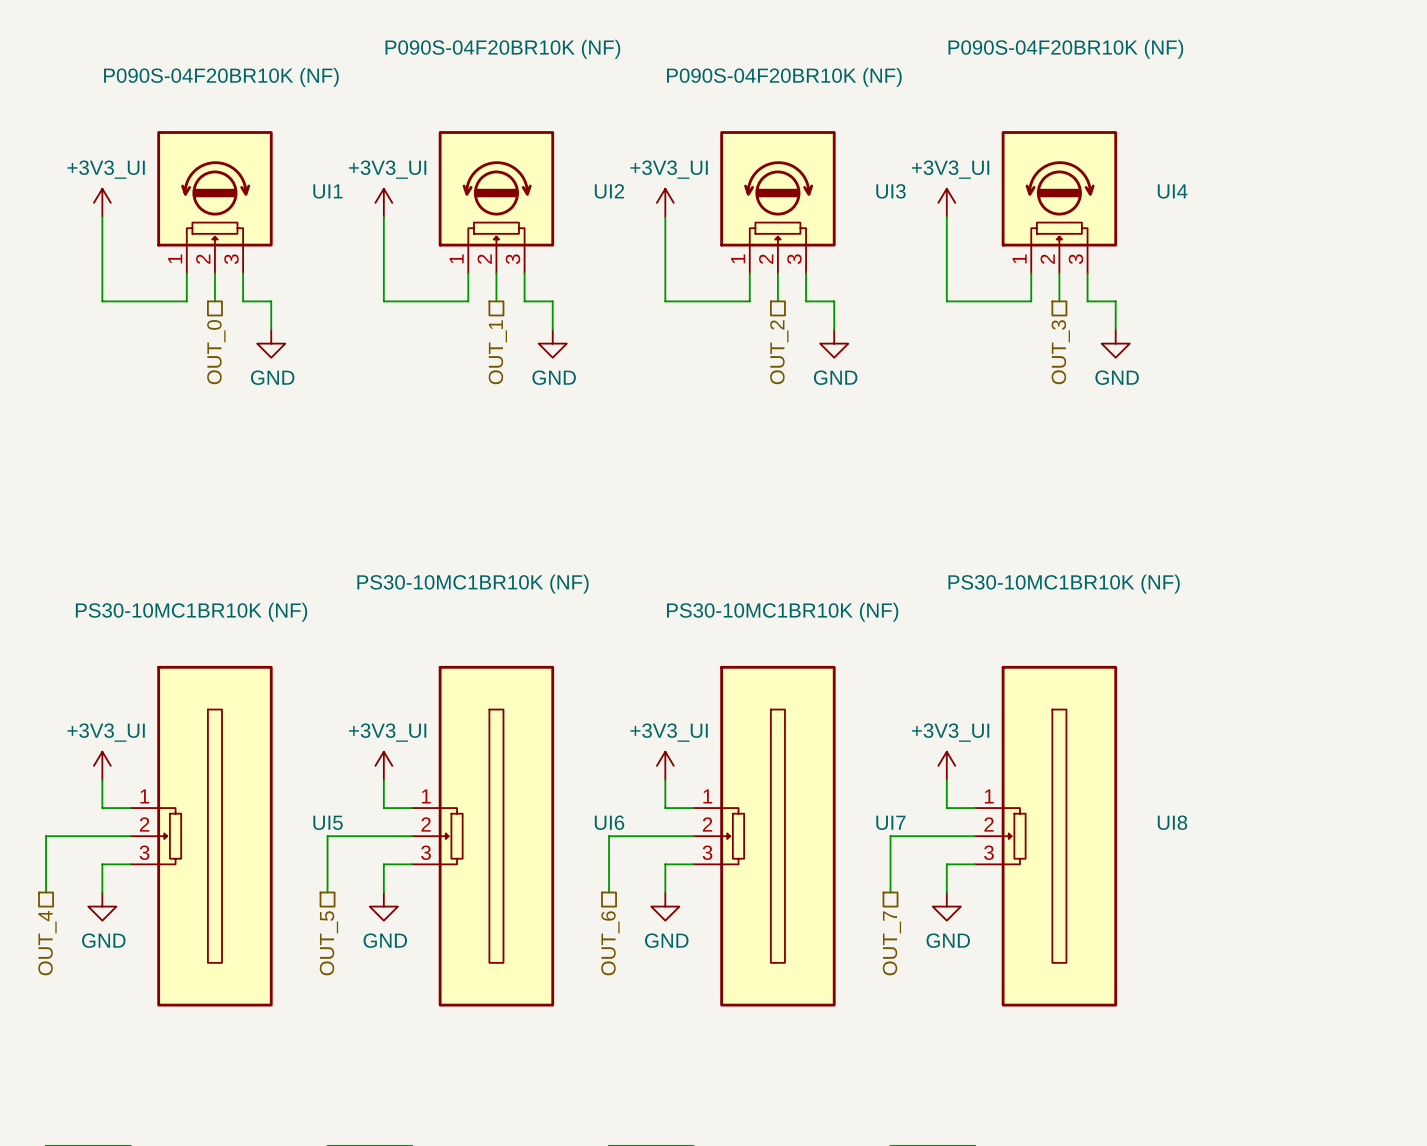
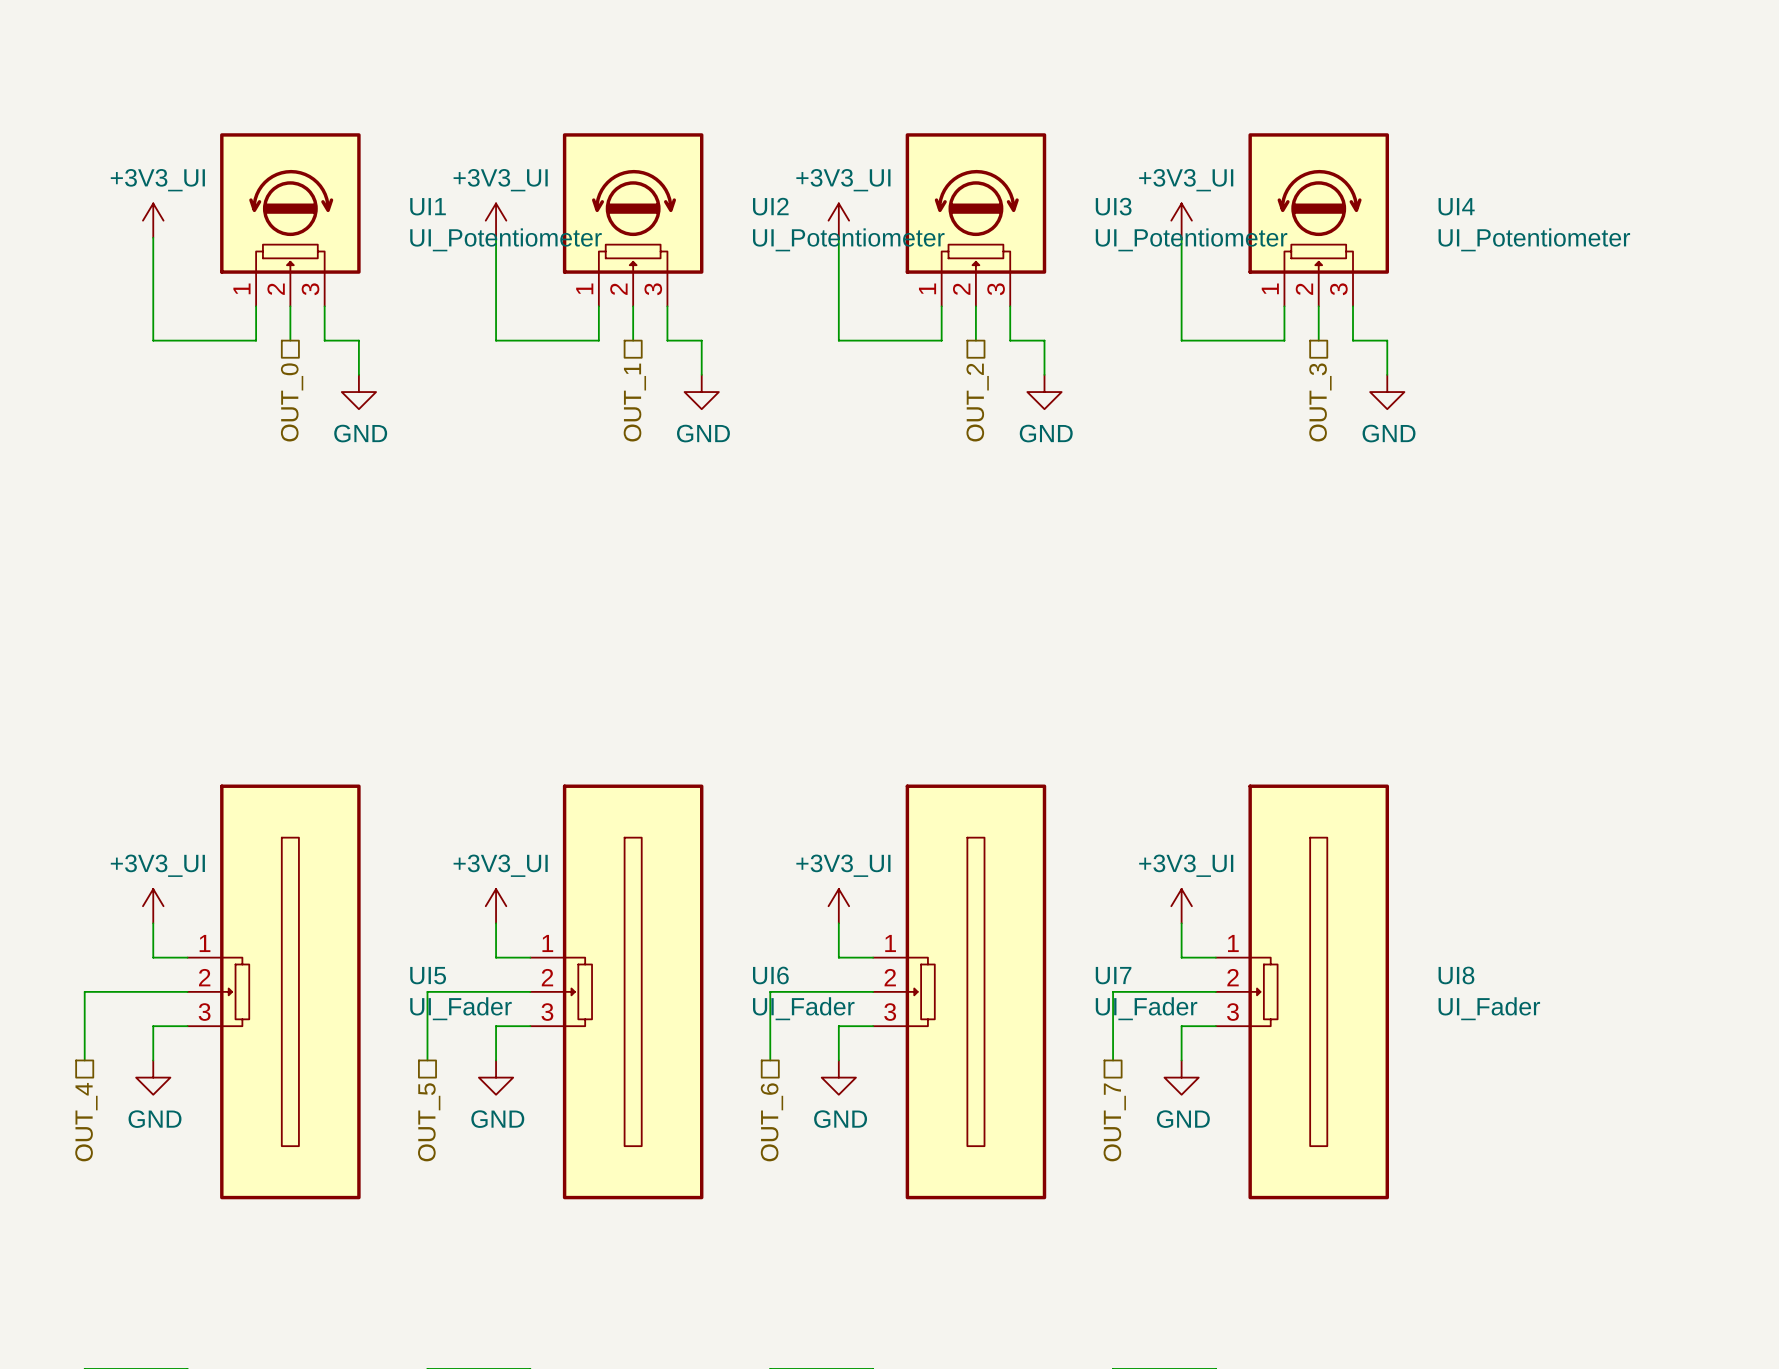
UI2 value: P090S-04F20BR10K (NF) (502, 49) -> UI_Potentiometer (848, 239)
UI4 value: P090S-04F20BR10K (NF) (1065, 49) -> UI_Potentiometer (1534, 239)
UI1 value: P090S-04F20BR10K (NF) (221, 77) -> UI_Potentiometer (505, 239)
UI3 value: P090S-04F20BR10K (NF) (784, 77) -> UI_Potentiometer (1191, 239)
UI6 value: PS30-10MC1BR10K (NF) (473, 584) -> UI_Fader (803, 1008)
UI8 value: PS30-10MC1BR10K (NF) (1064, 584) -> UI_Fader (1489, 1008)
UI5 value: PS30-10MC1BR10K (NF) (191, 612) -> UI_Fader (460, 1008)
UI7 value: PS30-10MC1BR10K (NF) (782, 612) -> UI_Fader (1146, 1008)

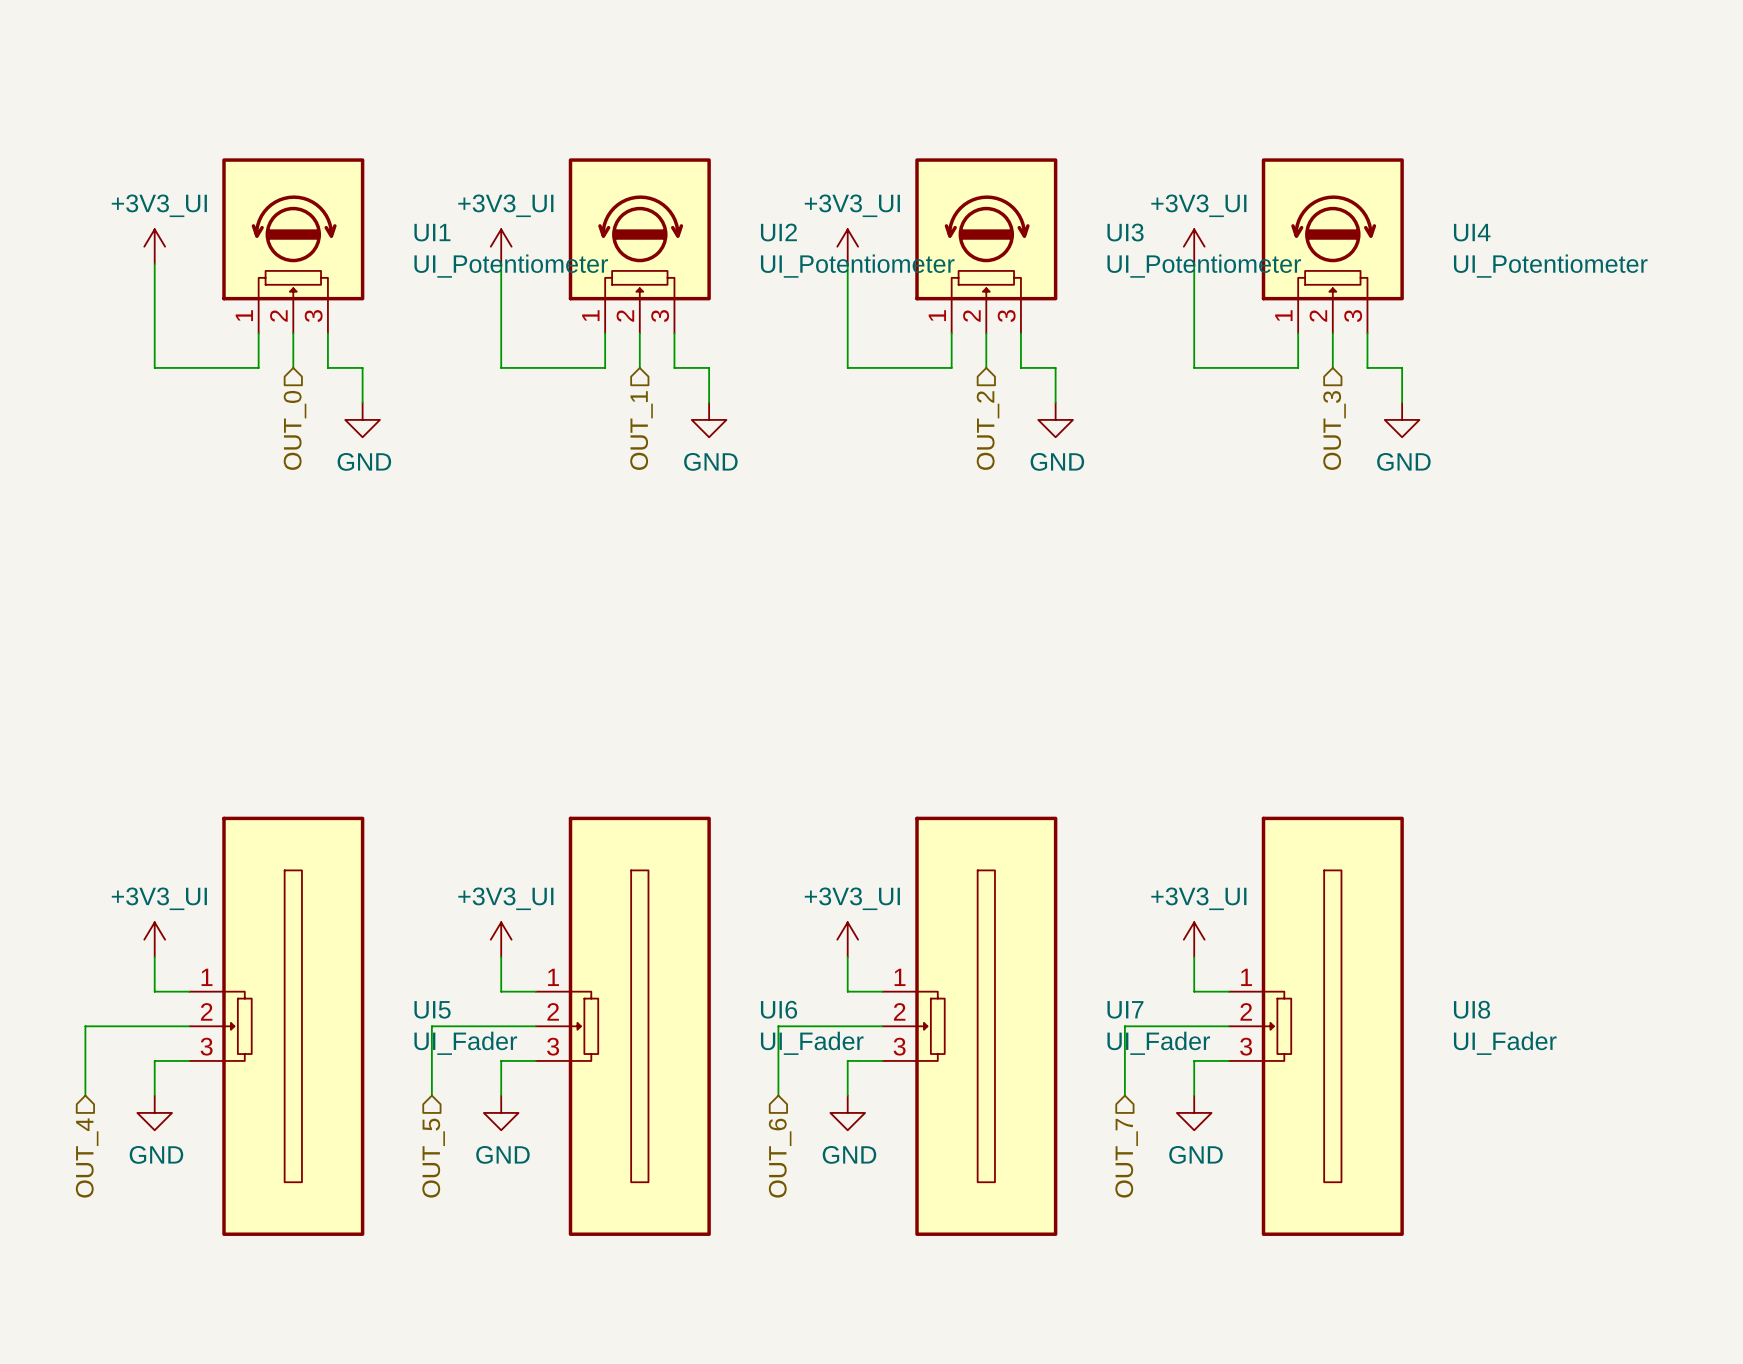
hierarchical label shape: passive (292, 402) -> input (295, 430)
hierarchical label shape: passive (634, 402) -> input (641, 430)
hierarchical label shape: passive (977, 402) -> input (988, 430)
hierarchical label shape: passive (1320, 402) -> input (1334, 430)
hierarchical label shape: passive (86, 1122) -> input (87, 1157)
hierarchical label shape: passive (429, 1122) -> input (433, 1158)
hierarchical label shape: passive (771, 1122) -> input (780, 1158)
hierarchical label shape: passive (1114, 1122) -> input (1126, 1158)

